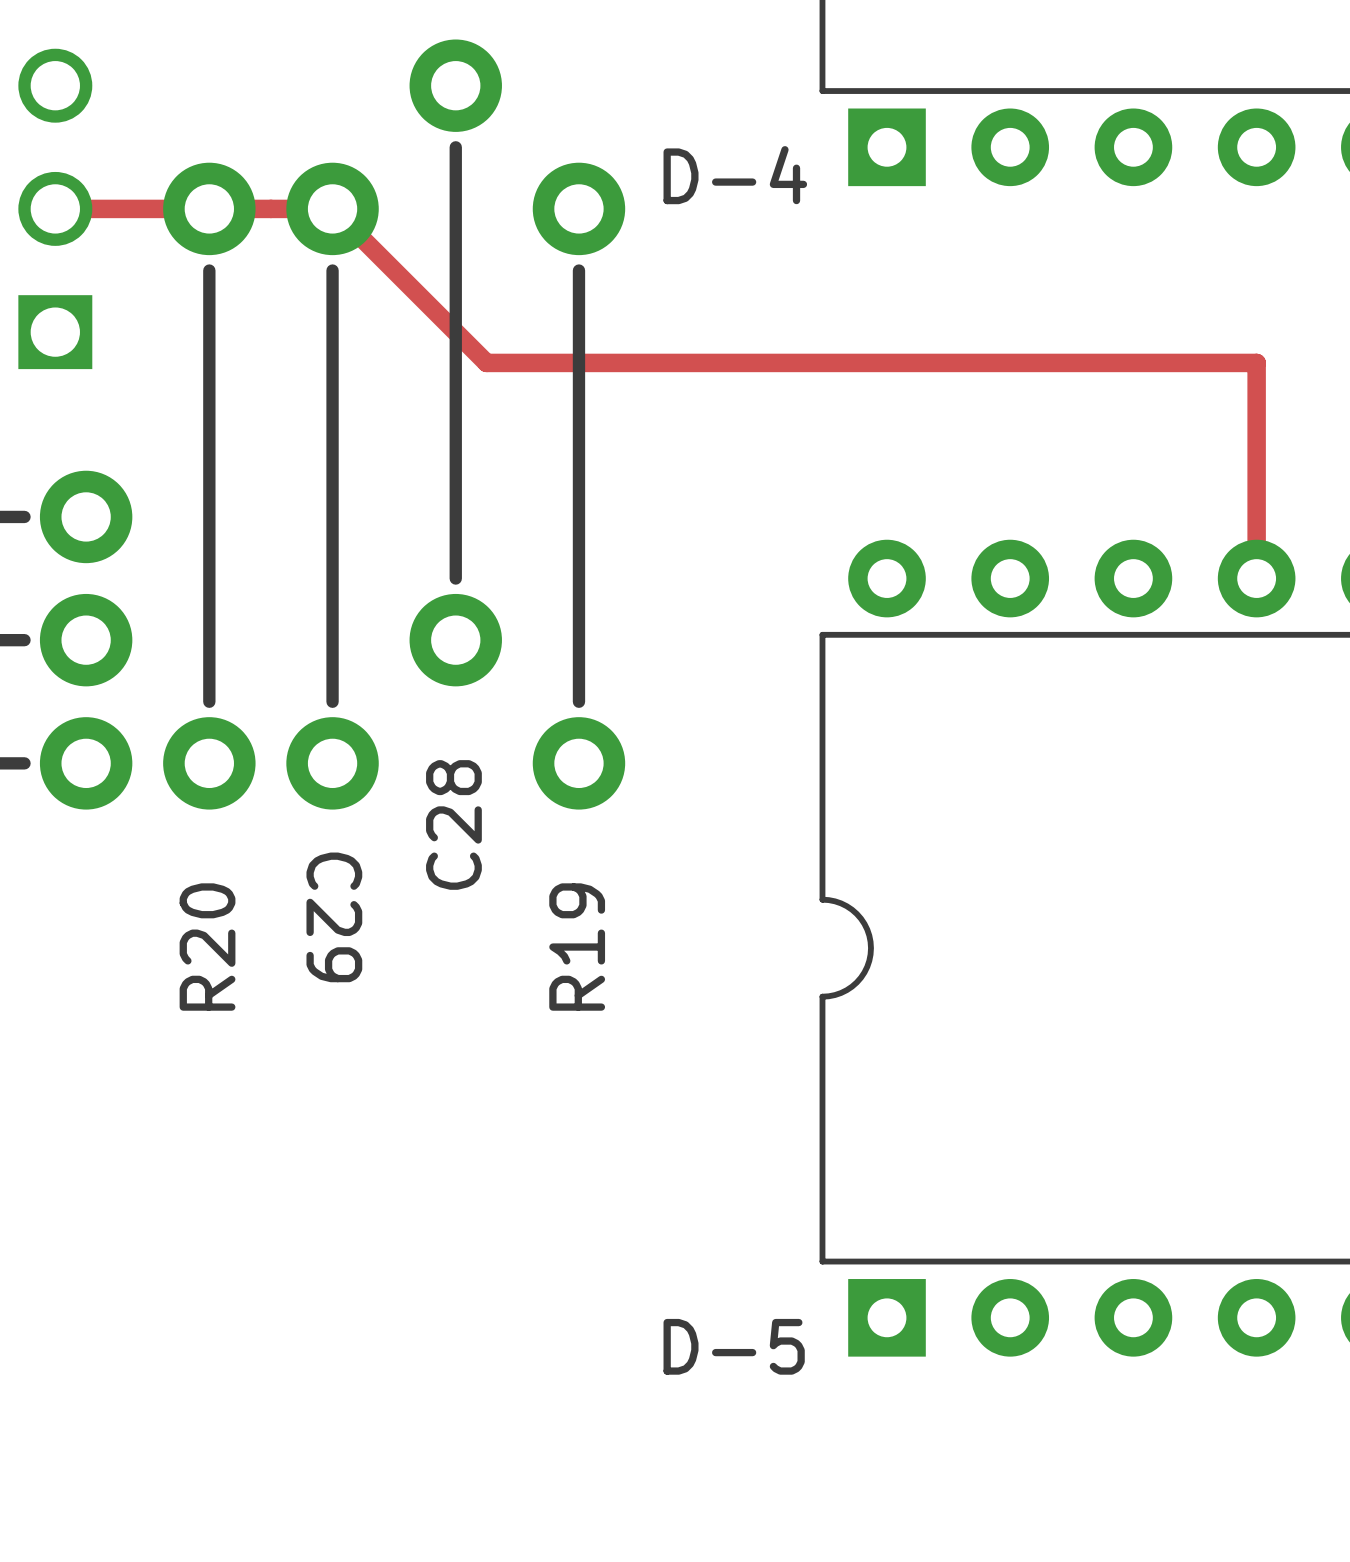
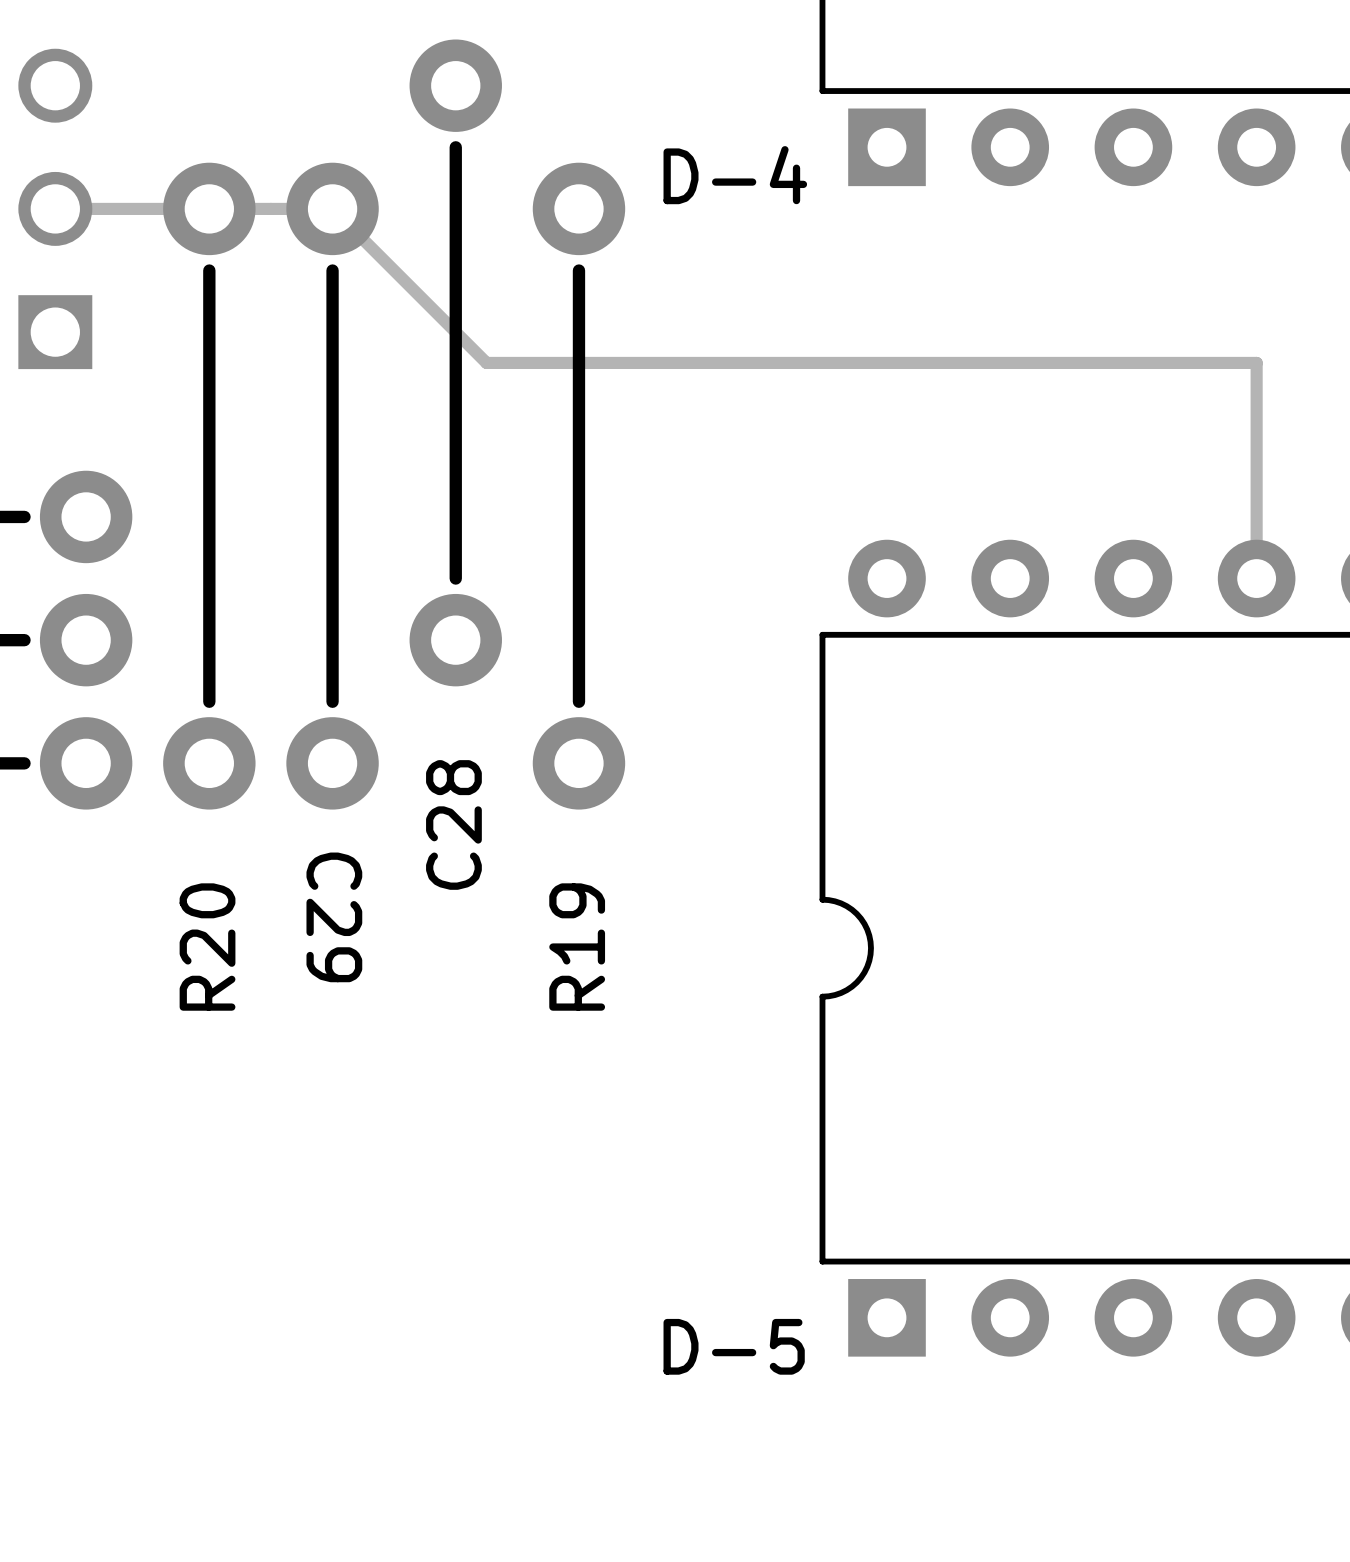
track width: thick (55, 208) (332, 208) (486, 362) (1256, 362) (1256, 578) -> thin (55, 208) (332, 208) (486, 362) (1256, 362) (1256, 578)

